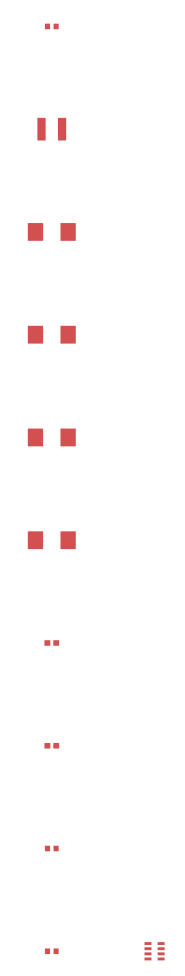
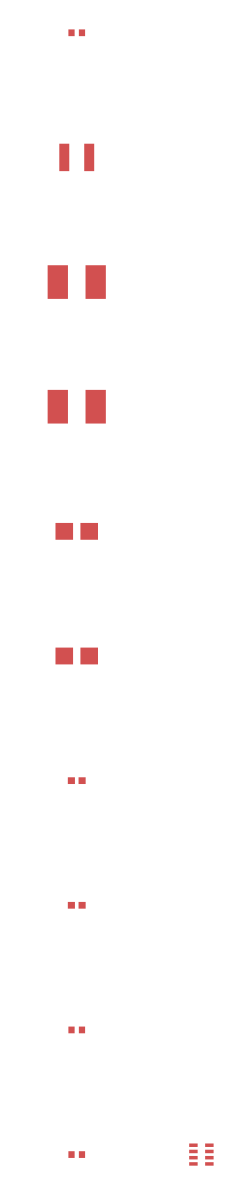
part footprint: [27, 223, 76, 241] -> [47, 265, 106, 299]
part footprint: [27, 325, 76, 344] -> [47, 389, 106, 424]
part footprint: [27, 428, 76, 447] -> [55, 522, 98, 540]
part footprint: [27, 531, 76, 550] -> [55, 647, 98, 665]

